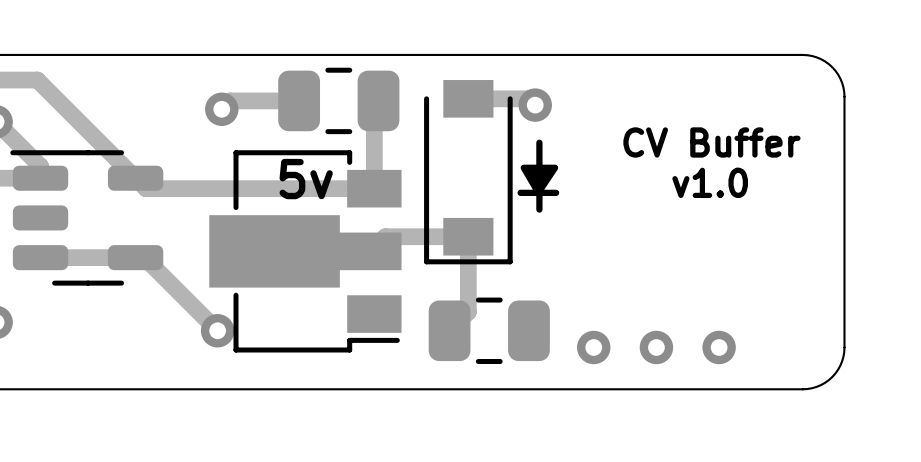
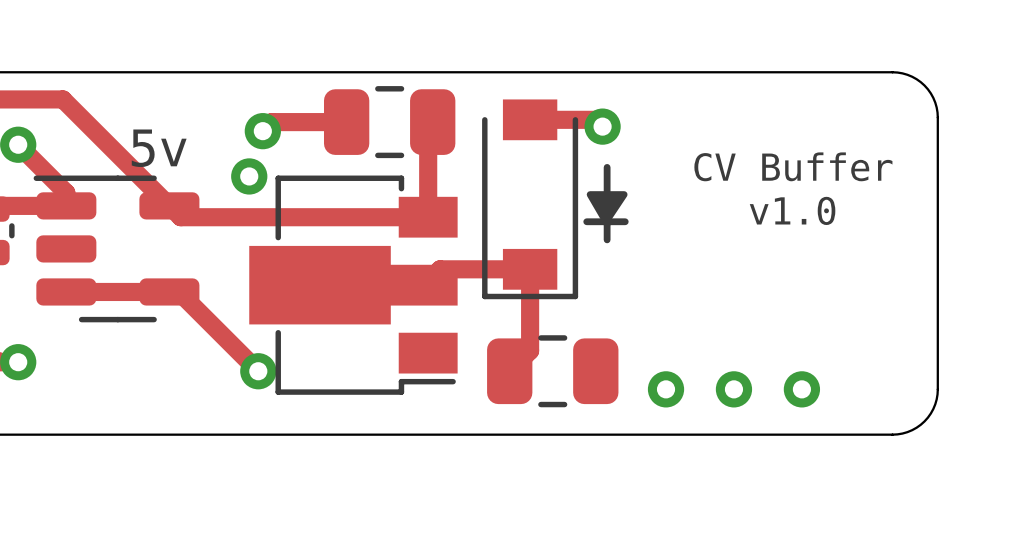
via: none -> (249, 176)
text position: 5v (306, 179) -> 5v (159, 148)

